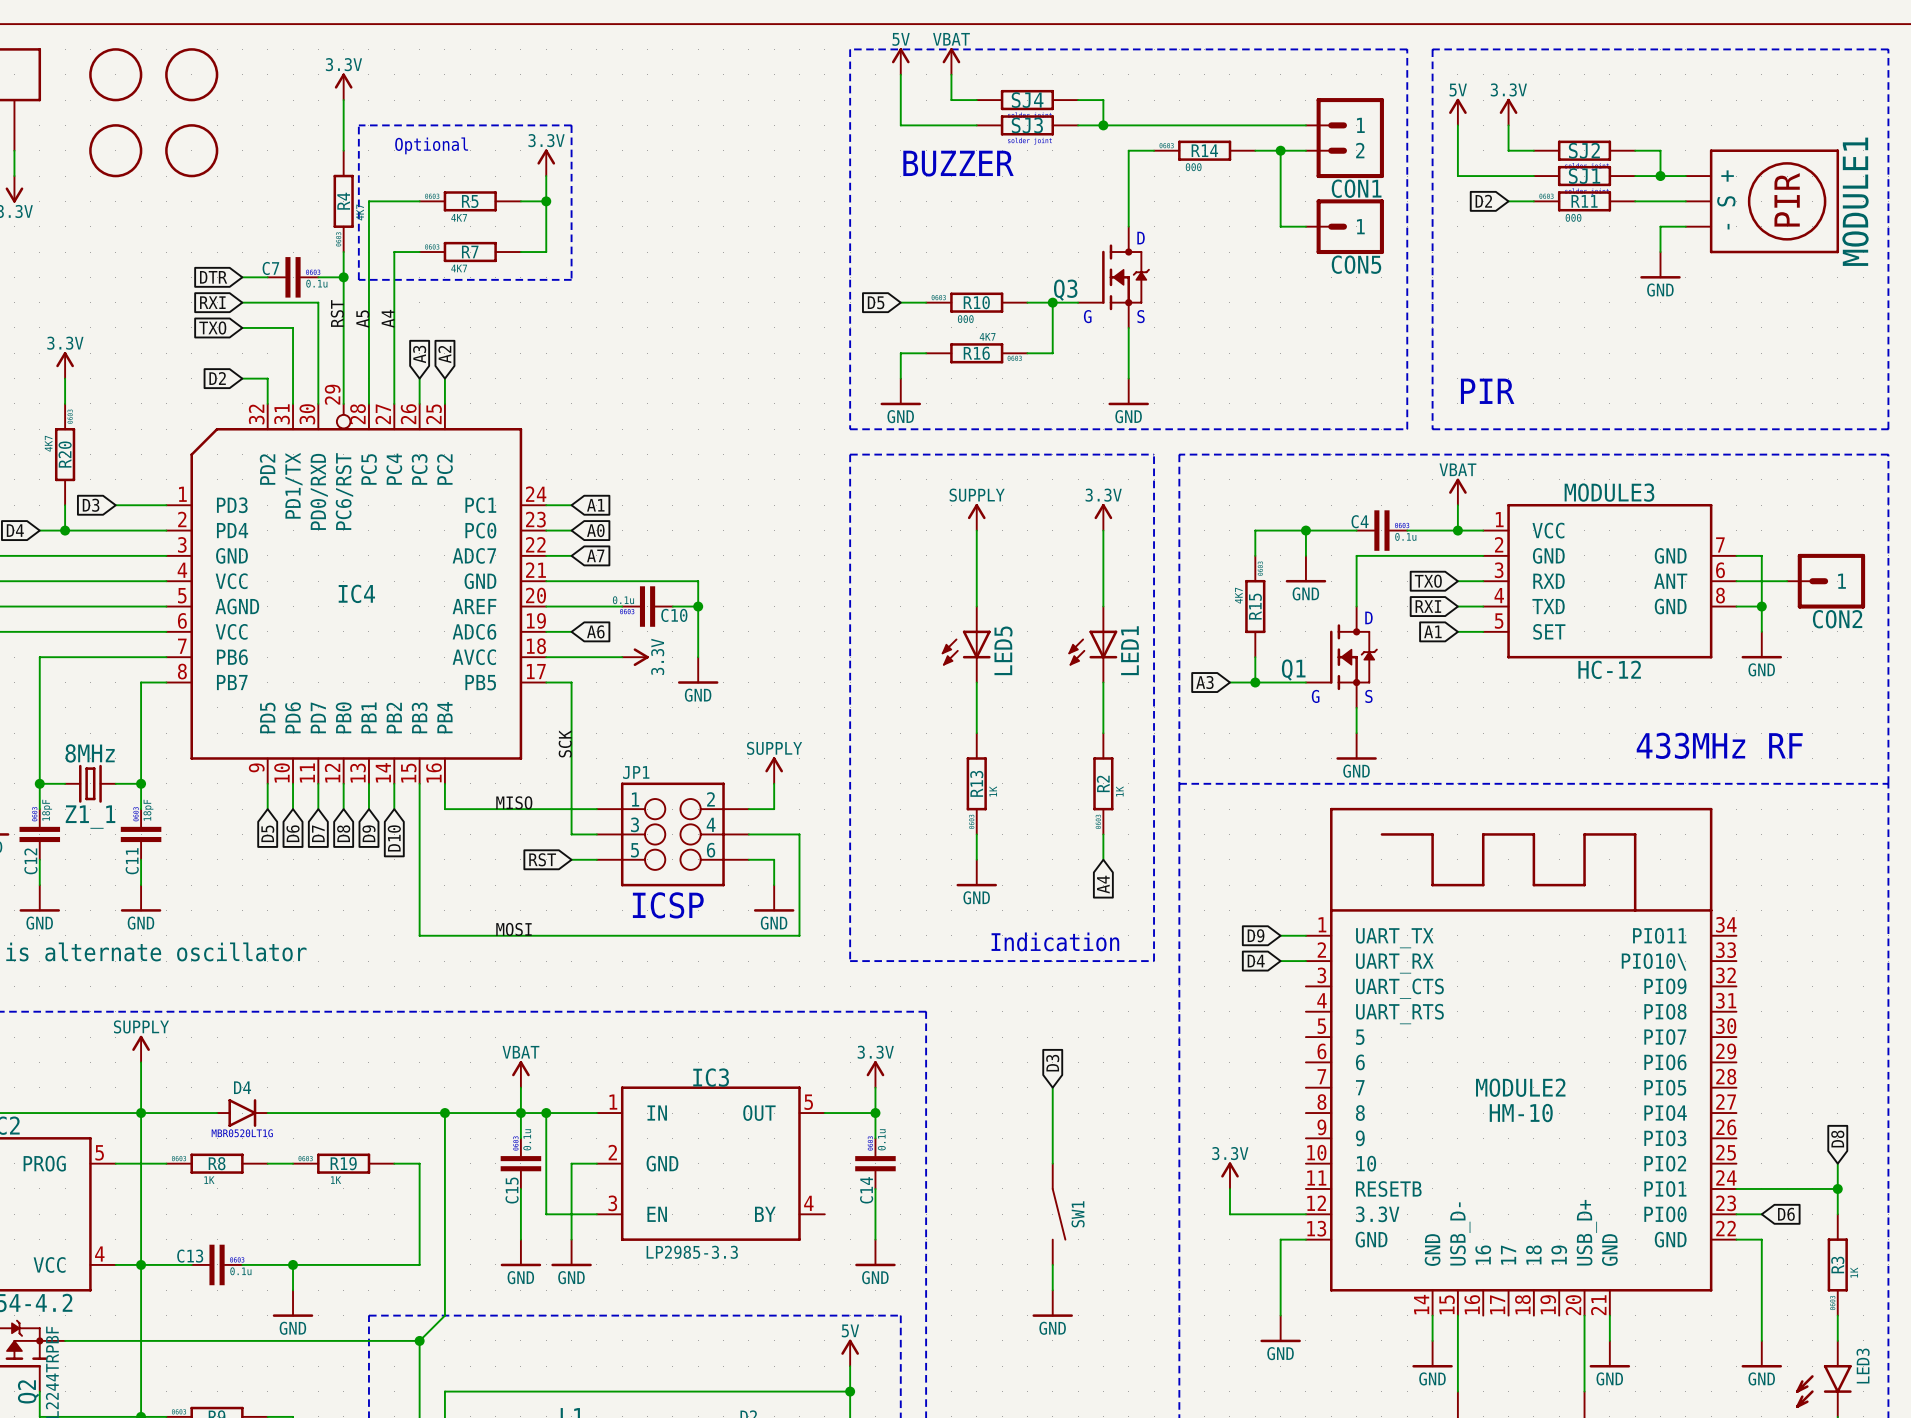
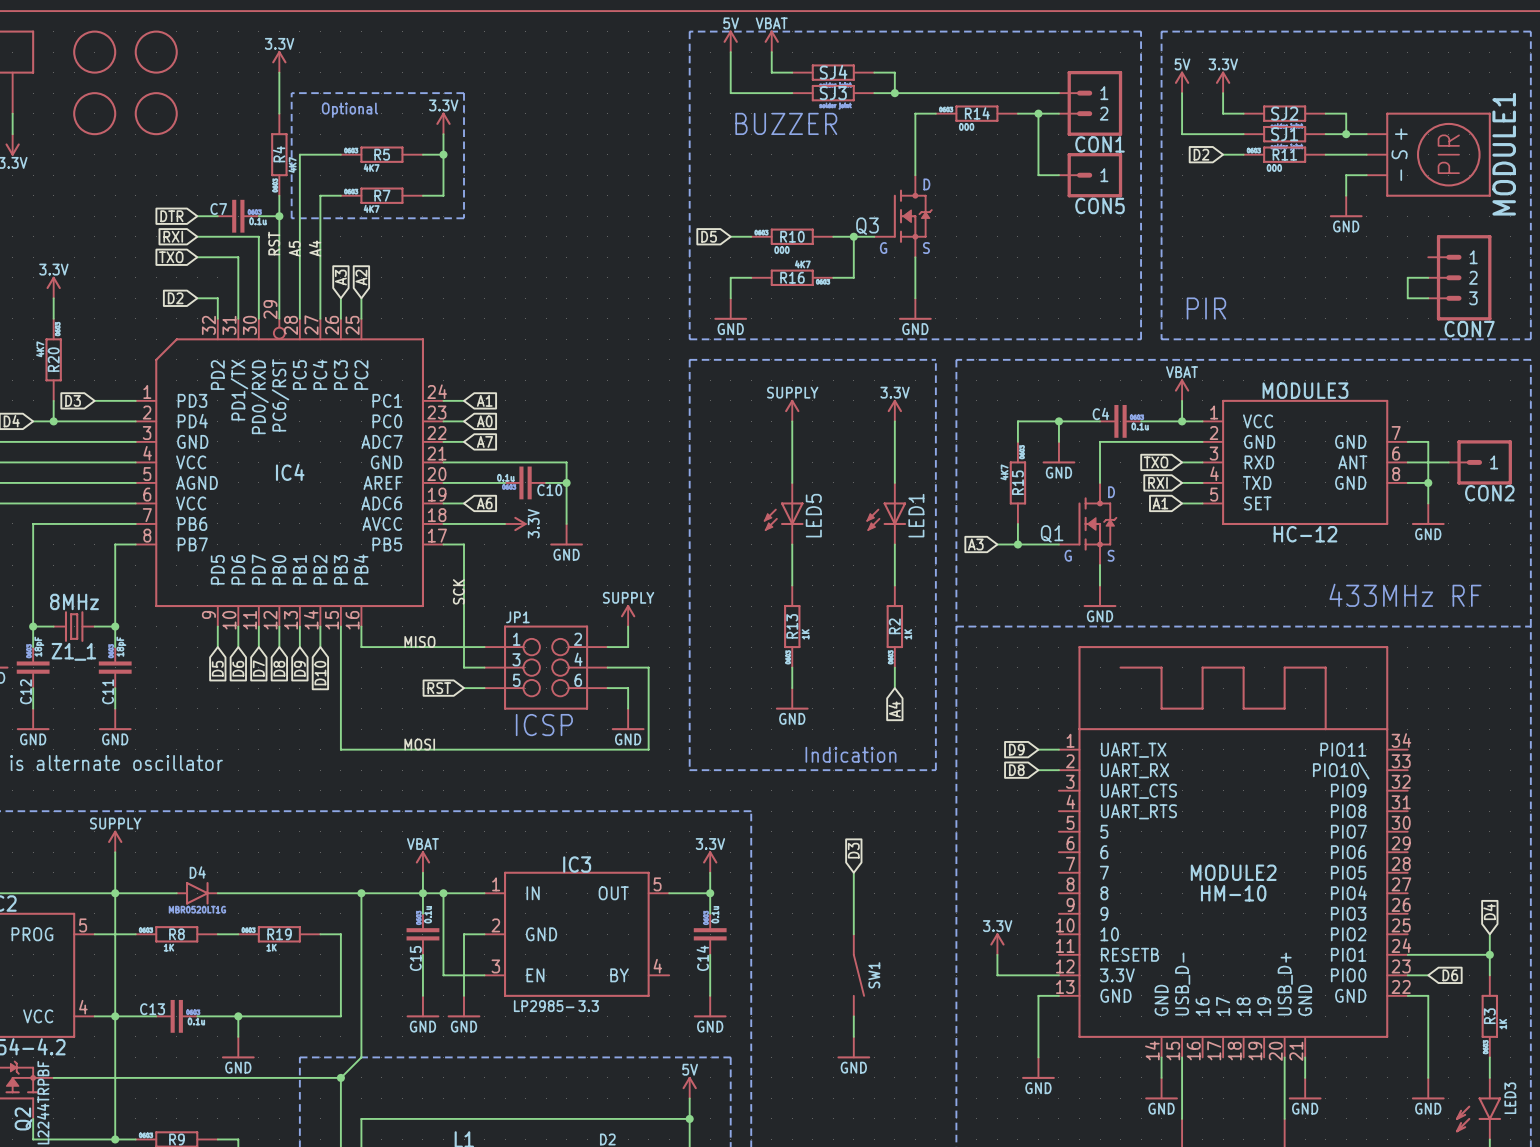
wire: none -> (1428, 277) (1407, 277) (1407, 298) (1428, 298)
CON7: none -> (1459, 277)
global label: D4 (1256, 961) -> D8 (1016, 770)
global label: D8 (1837, 1139) -> D4 (1489, 912)

